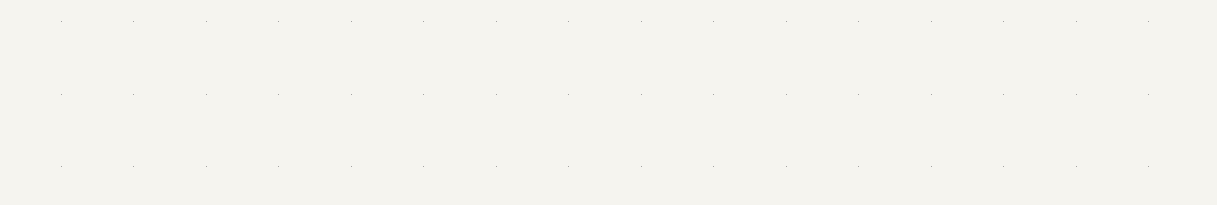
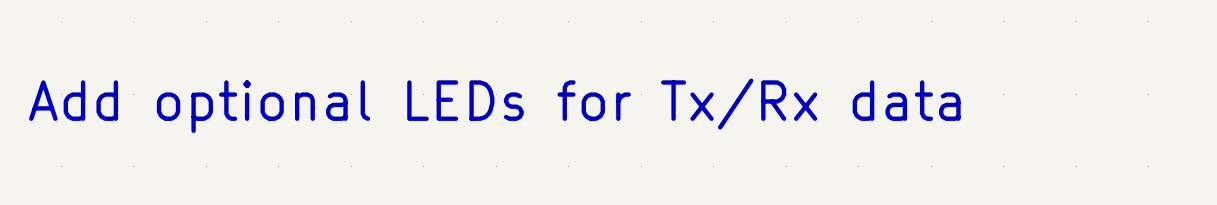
text: none -> Add optional LEDs for Tx/Rx data (494, 105)

